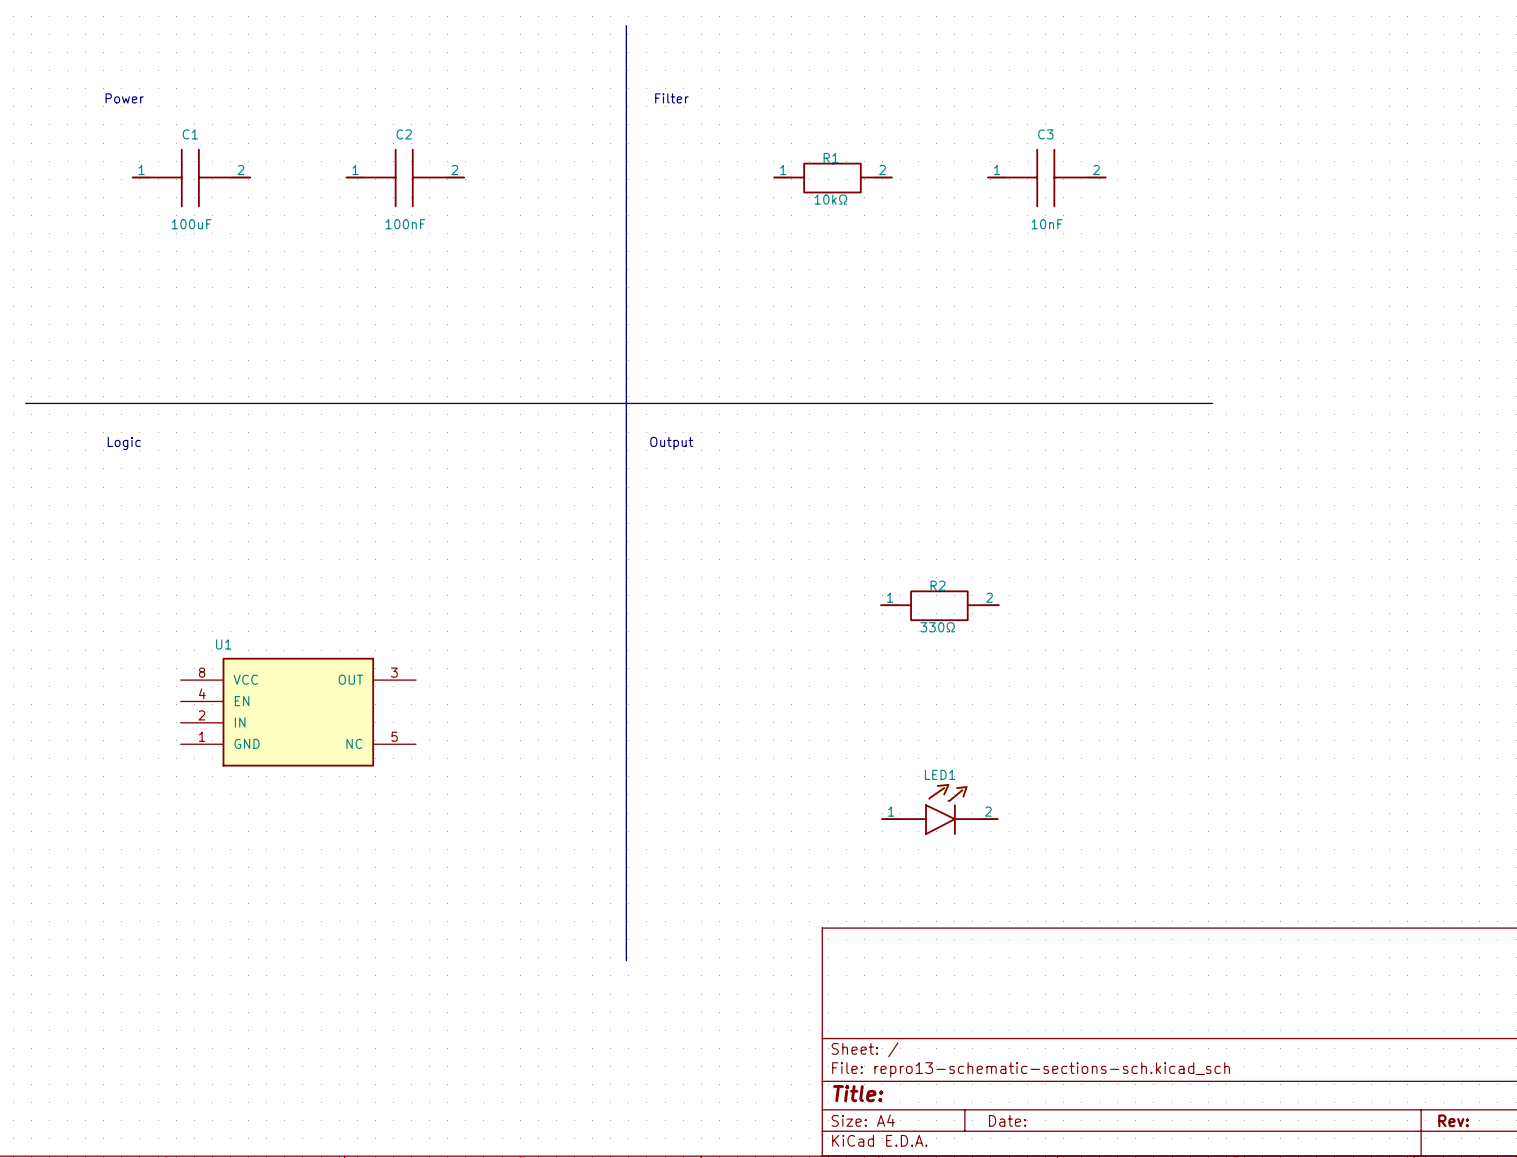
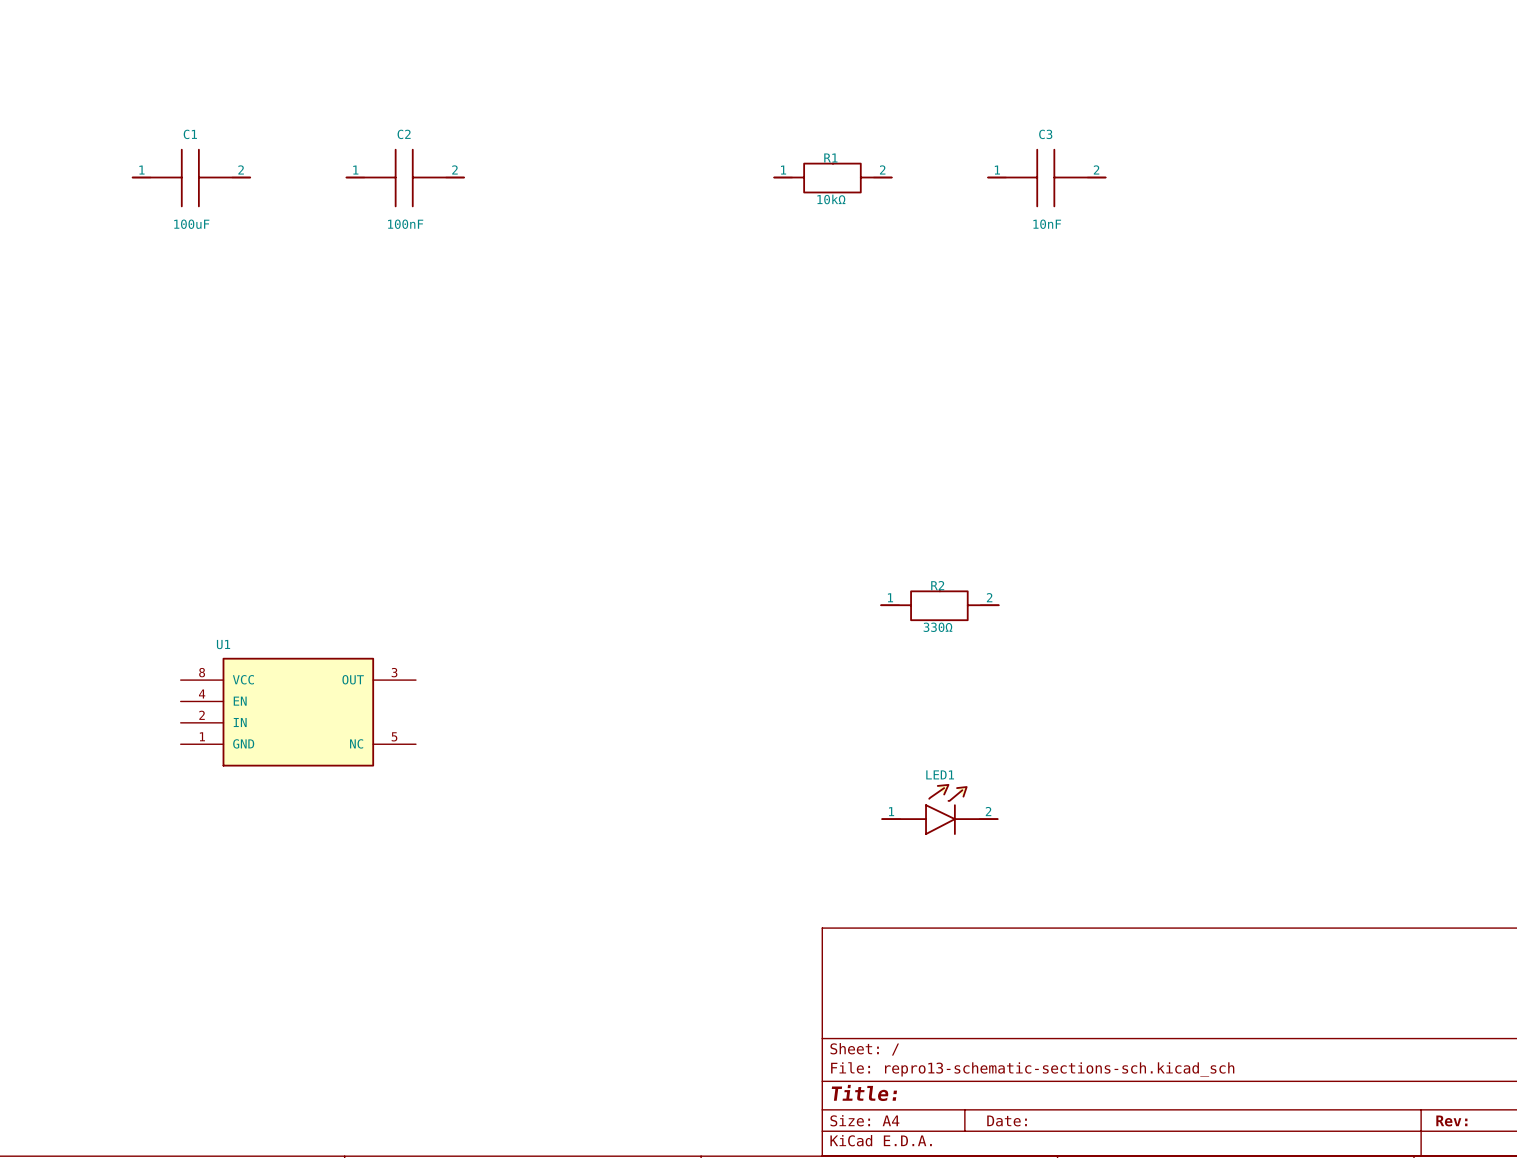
line: (626, 25) (626, 960) -> none
text: Power (124, 98) -> none
text: Filter (671, 98) -> none
line: (25, 403) (1212, 403) -> none
text: Logic (124, 443) -> none
text: Output (671, 443) -> none

